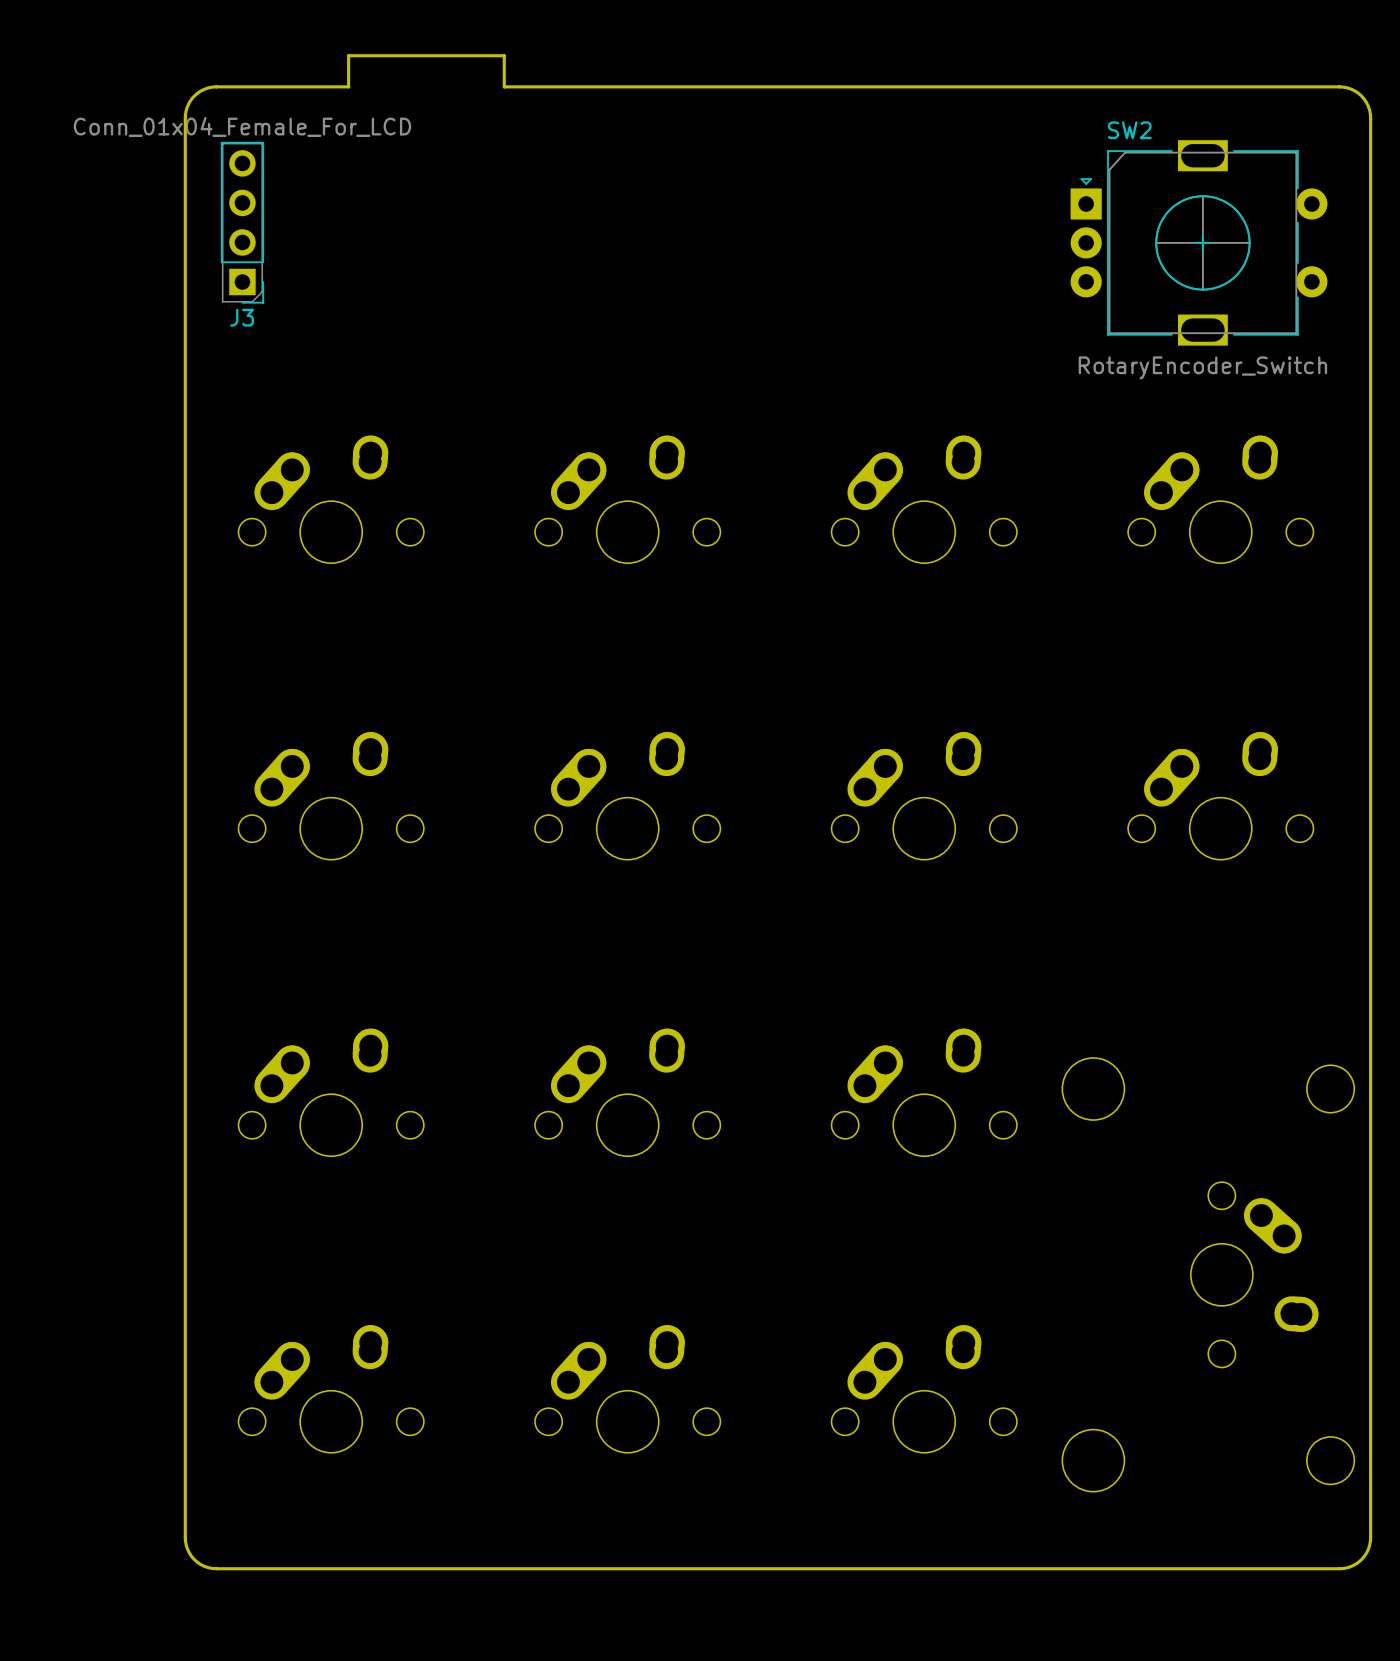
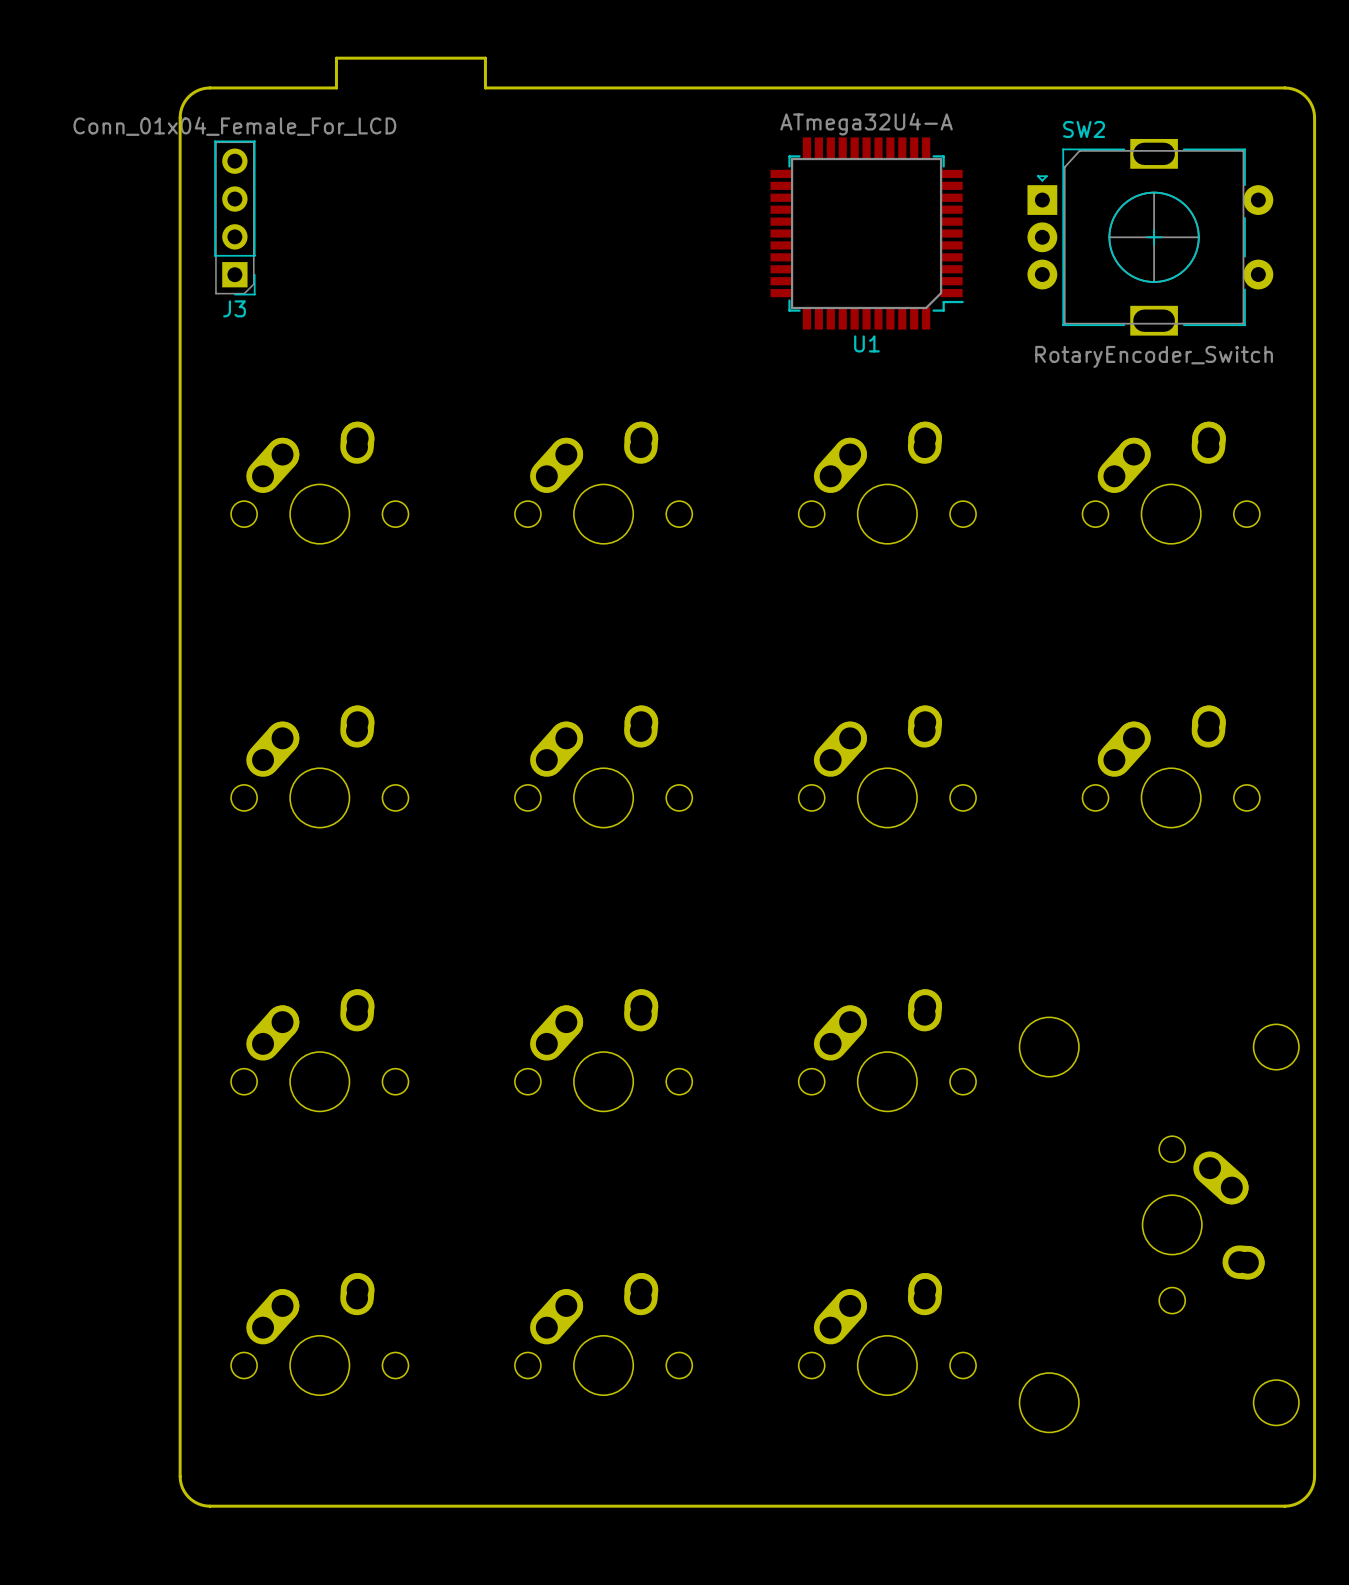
U1: none -> ATmega32U4-A (867, 233)

